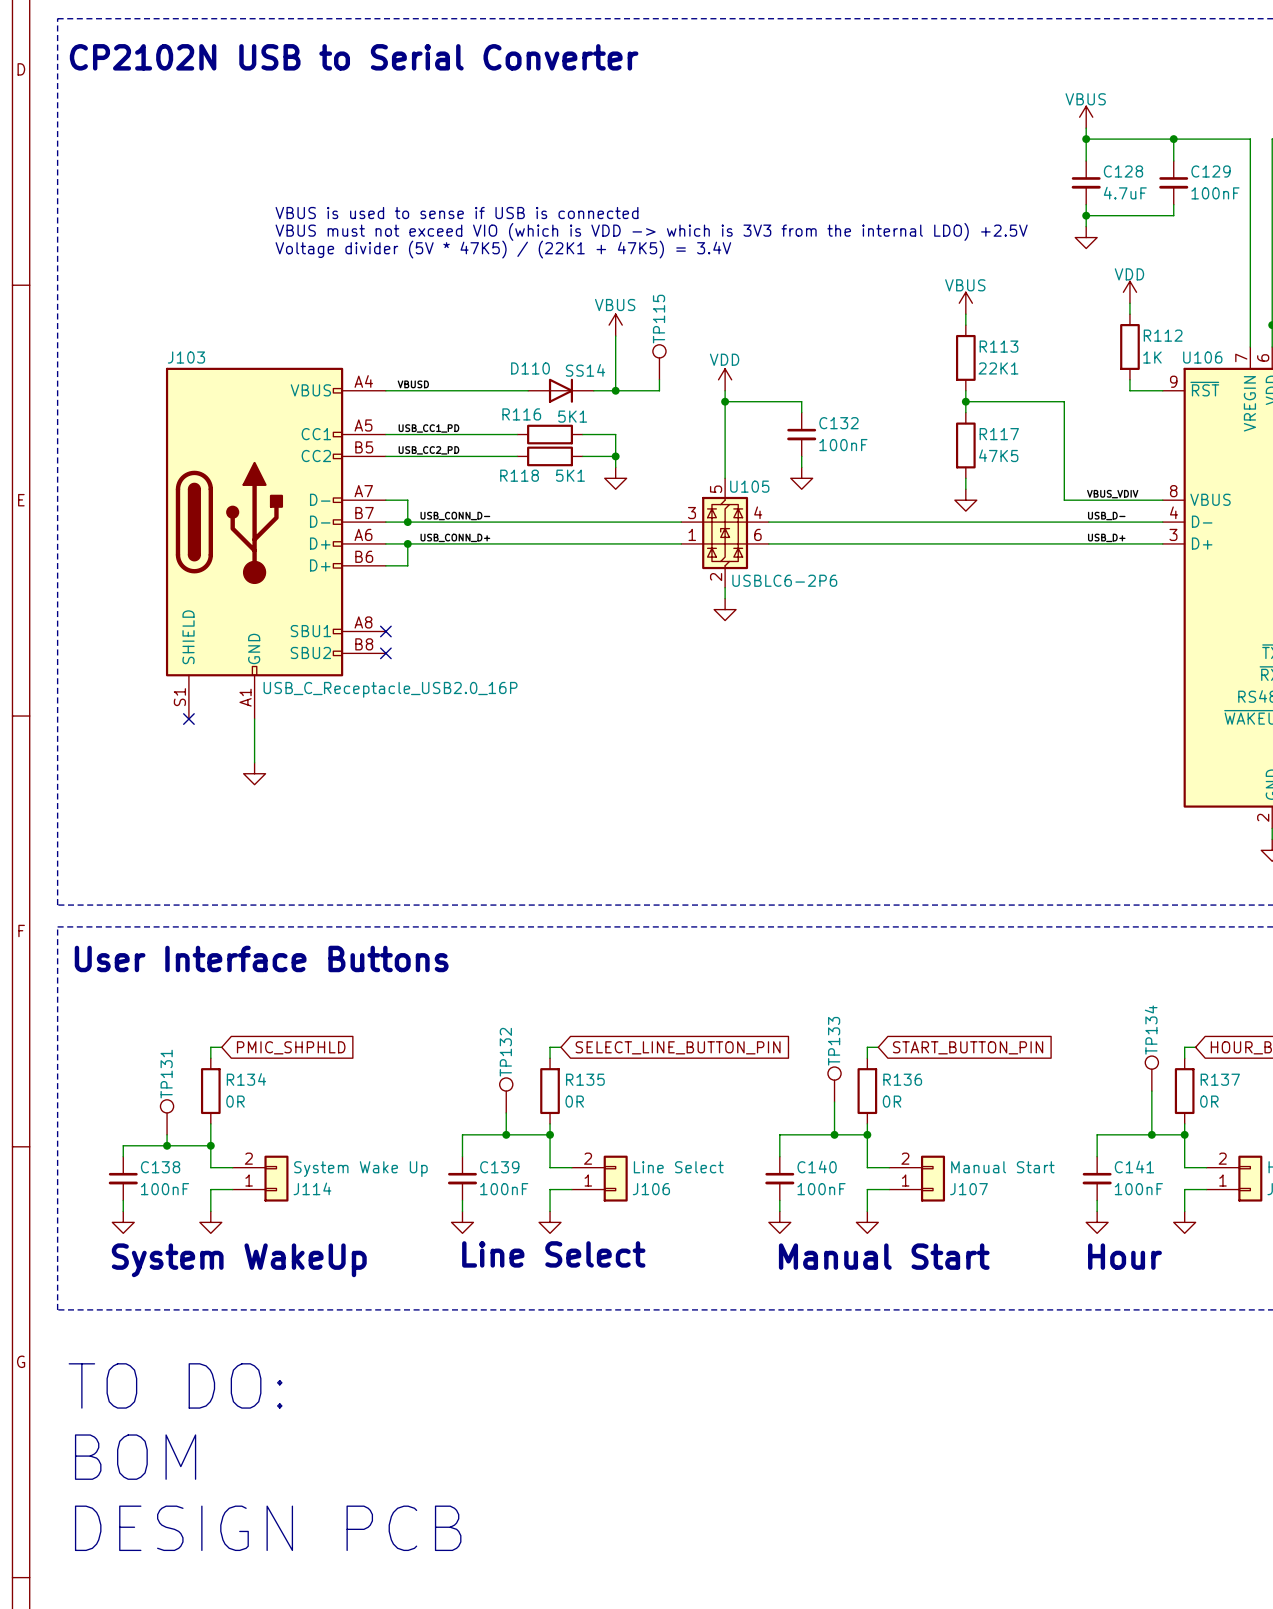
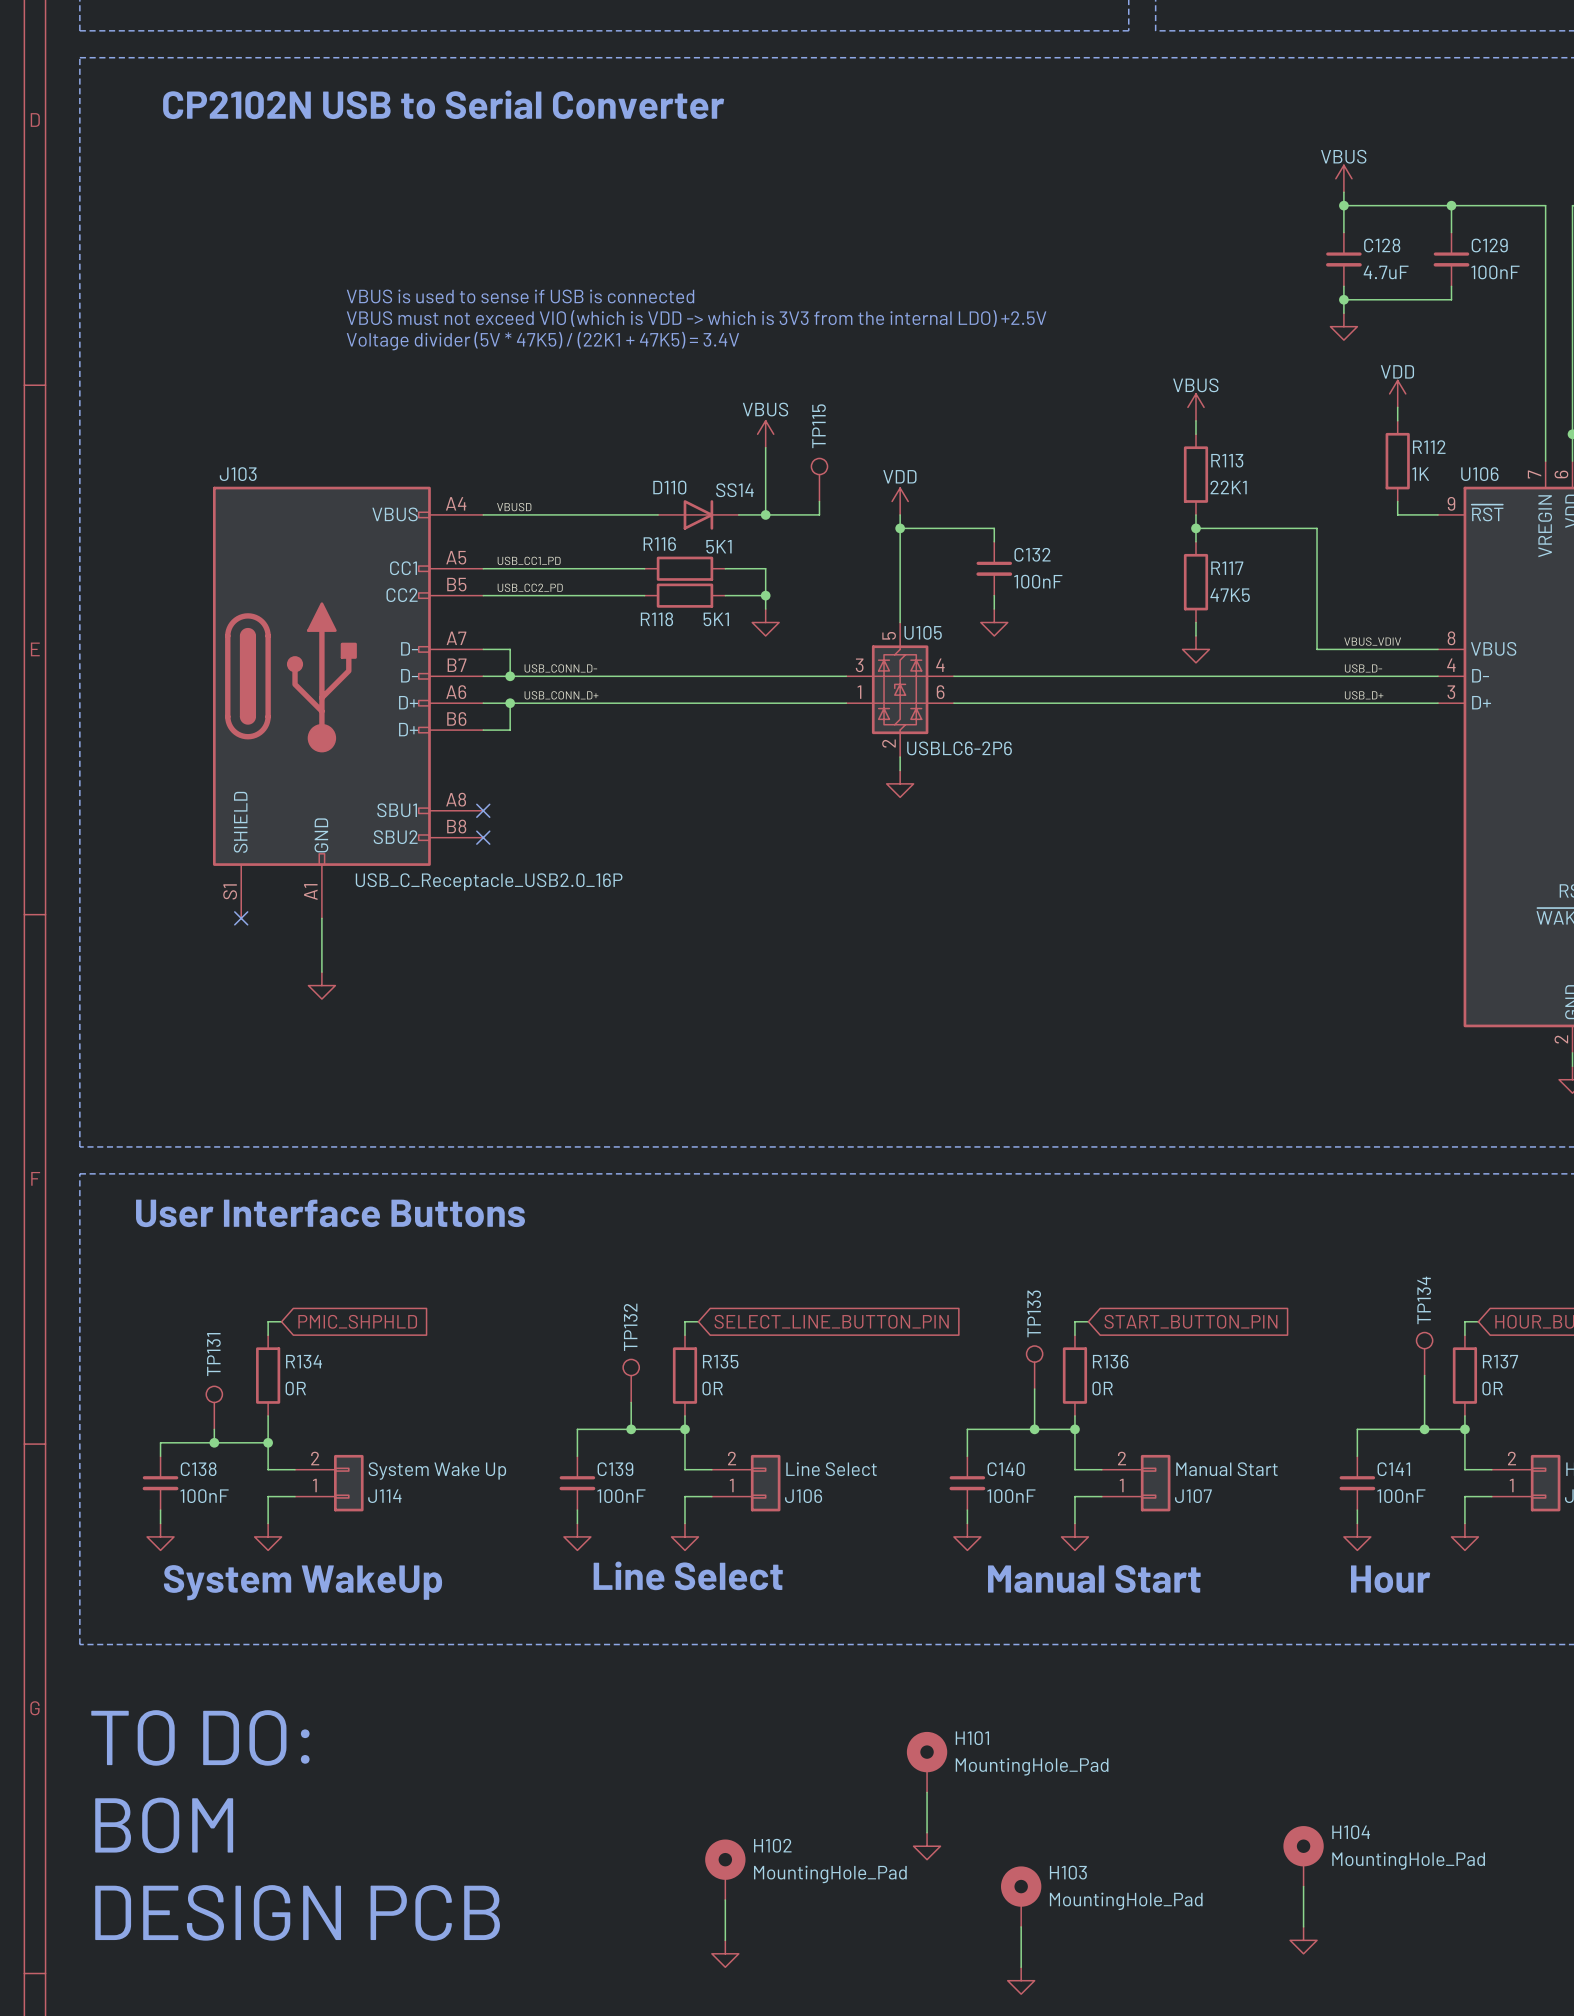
H101: none -> MountingHole_Pad (927, 1762)
wire: none -> (927, 1792) (927, 1832)
power symbol: none -> (927, 1846)
H104: none -> MountingHole_Pad (1303, 1856)
H102: none -> MountingHole_Pad (725, 1869)
wire: none -> (1303, 1886) (1303, 1926)
H103: none -> MountingHole_Pad (1021, 1896)
wire: none -> (725, 1900) (725, 1940)
wire: none -> (1021, 1926) (1021, 1967)
power symbol: none -> (1303, 1940)
power symbol: none -> (725, 1953)
power symbol: none -> (1021, 1980)

